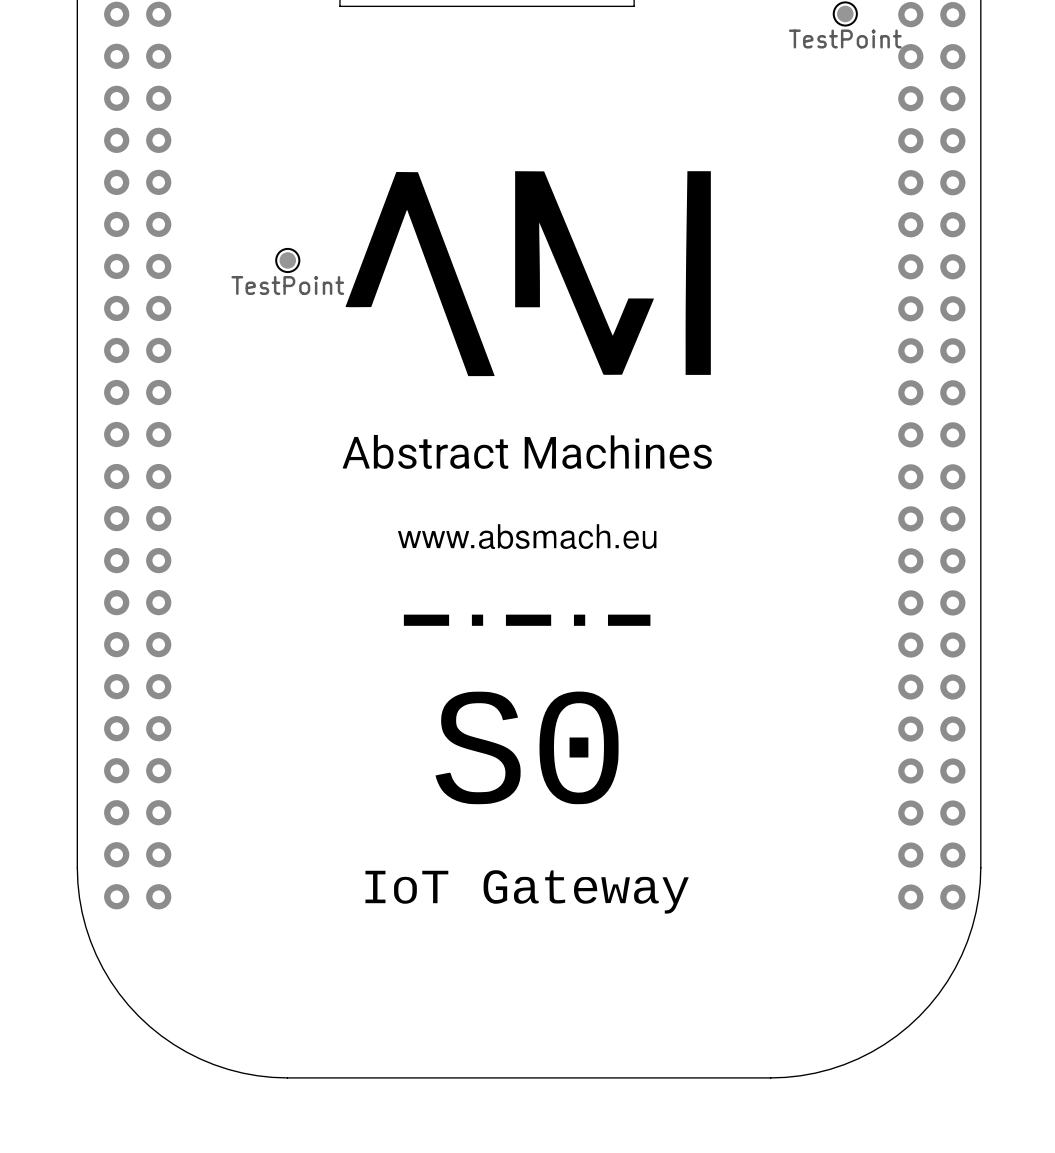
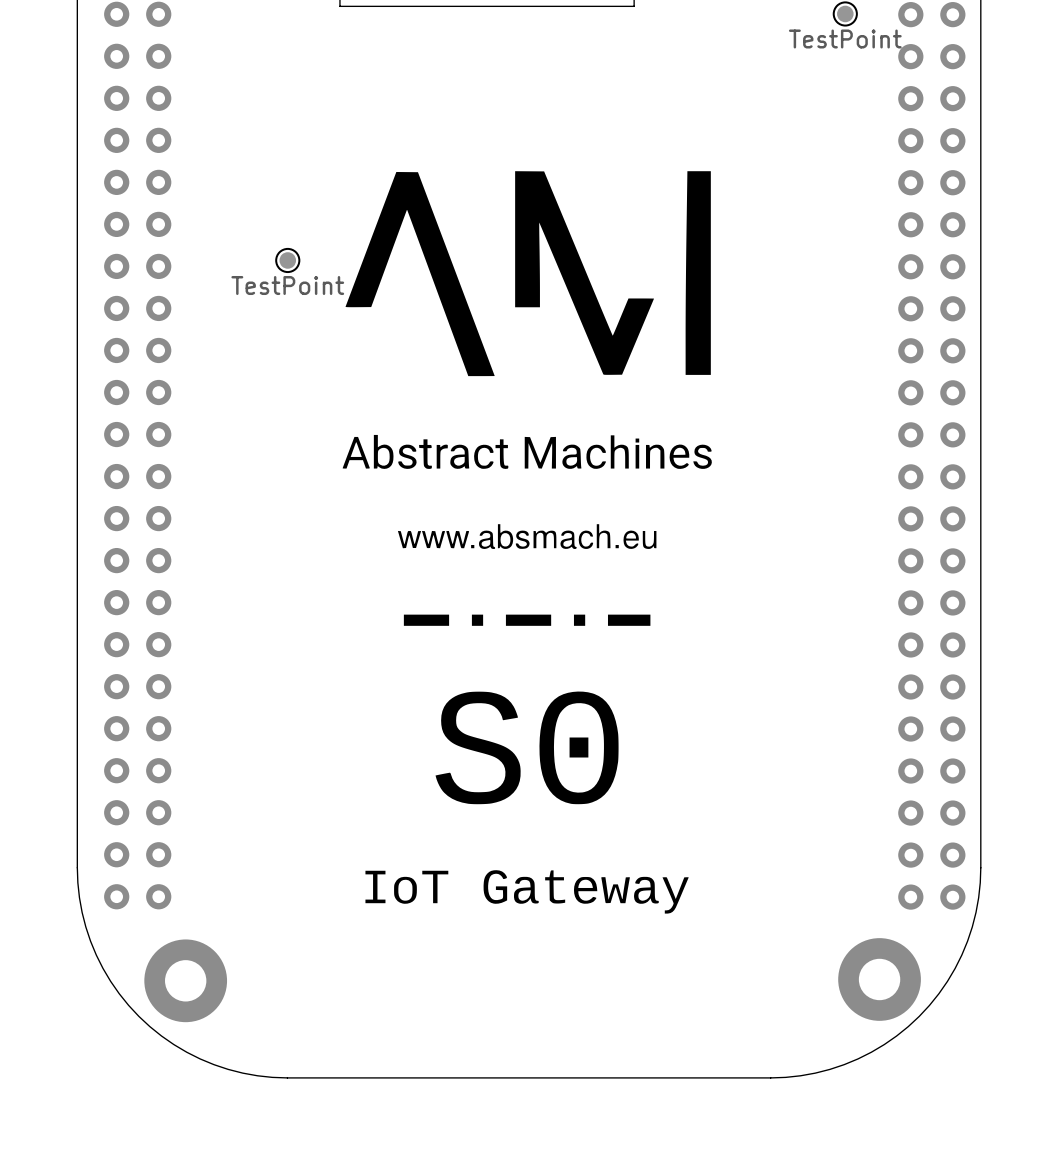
part: none -> (879, 979)
part: none -> (185, 980)

